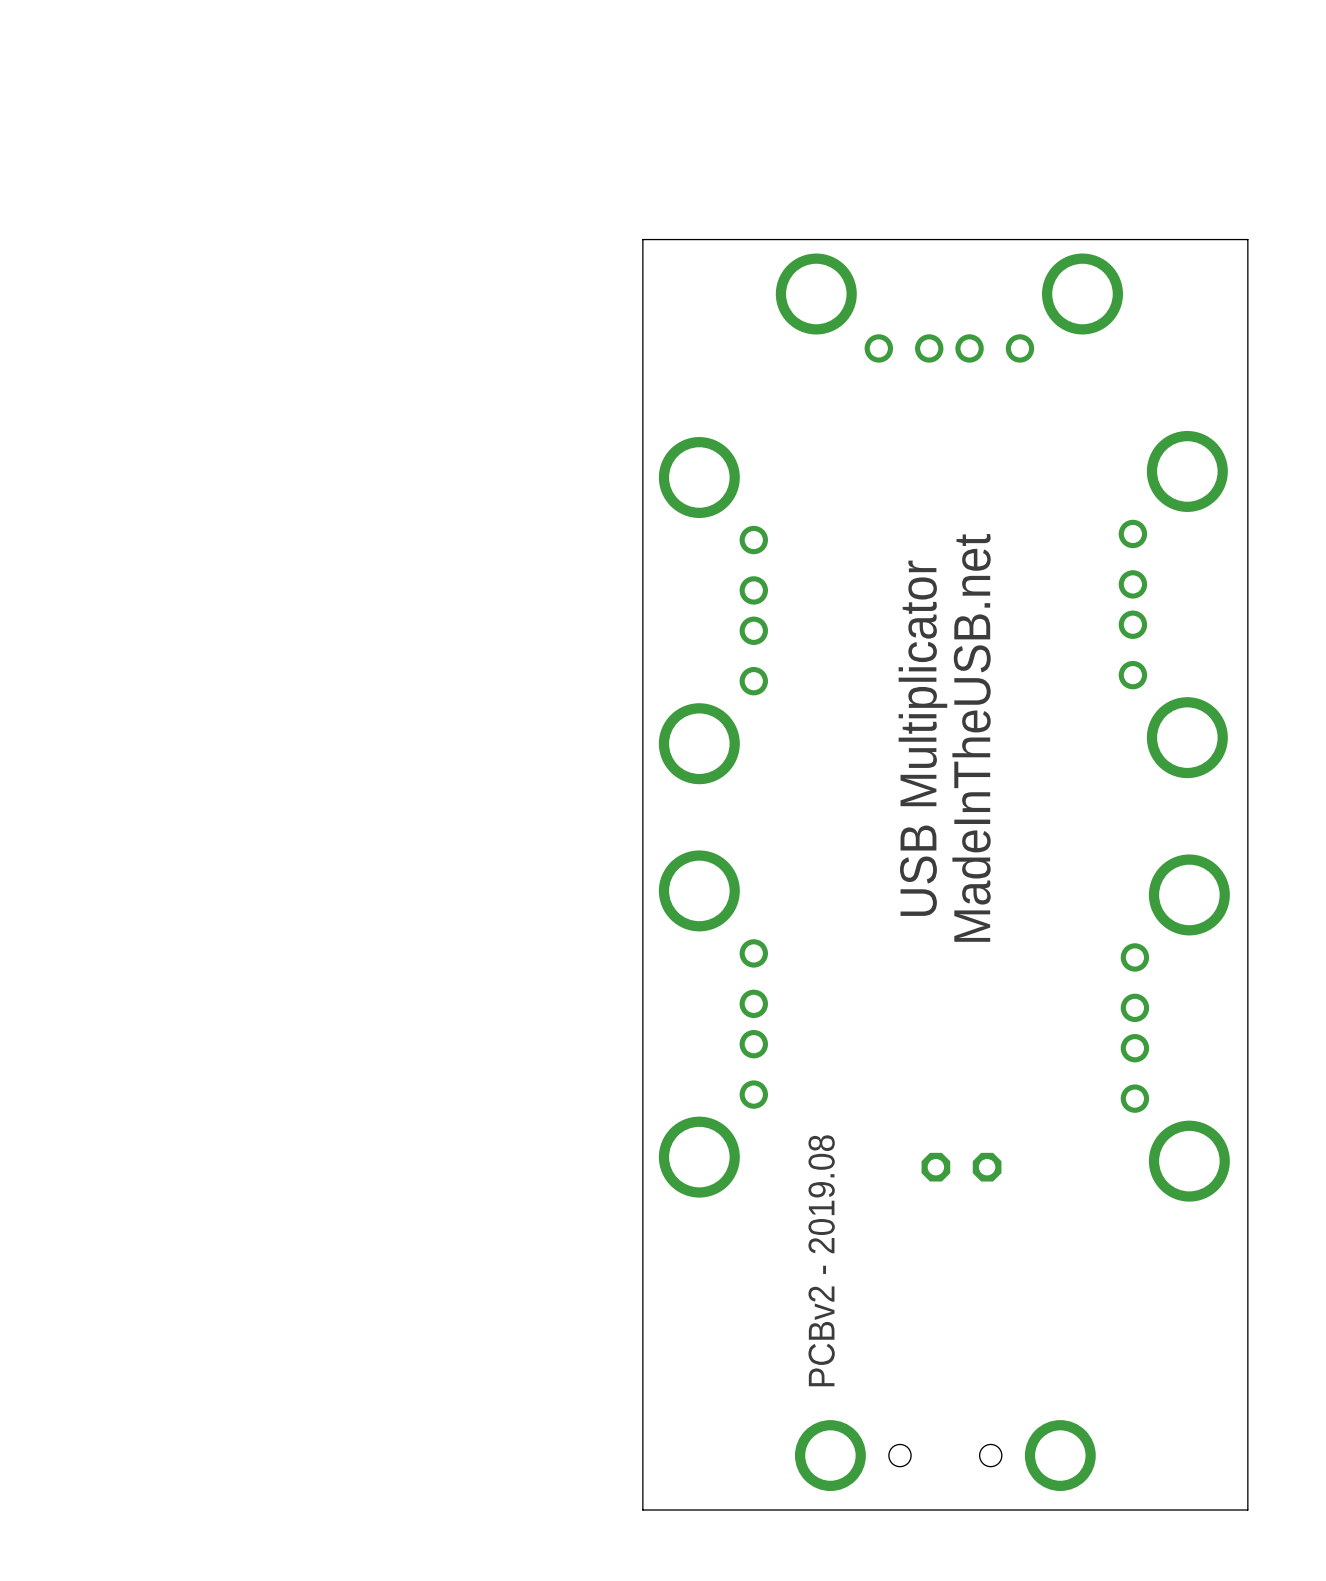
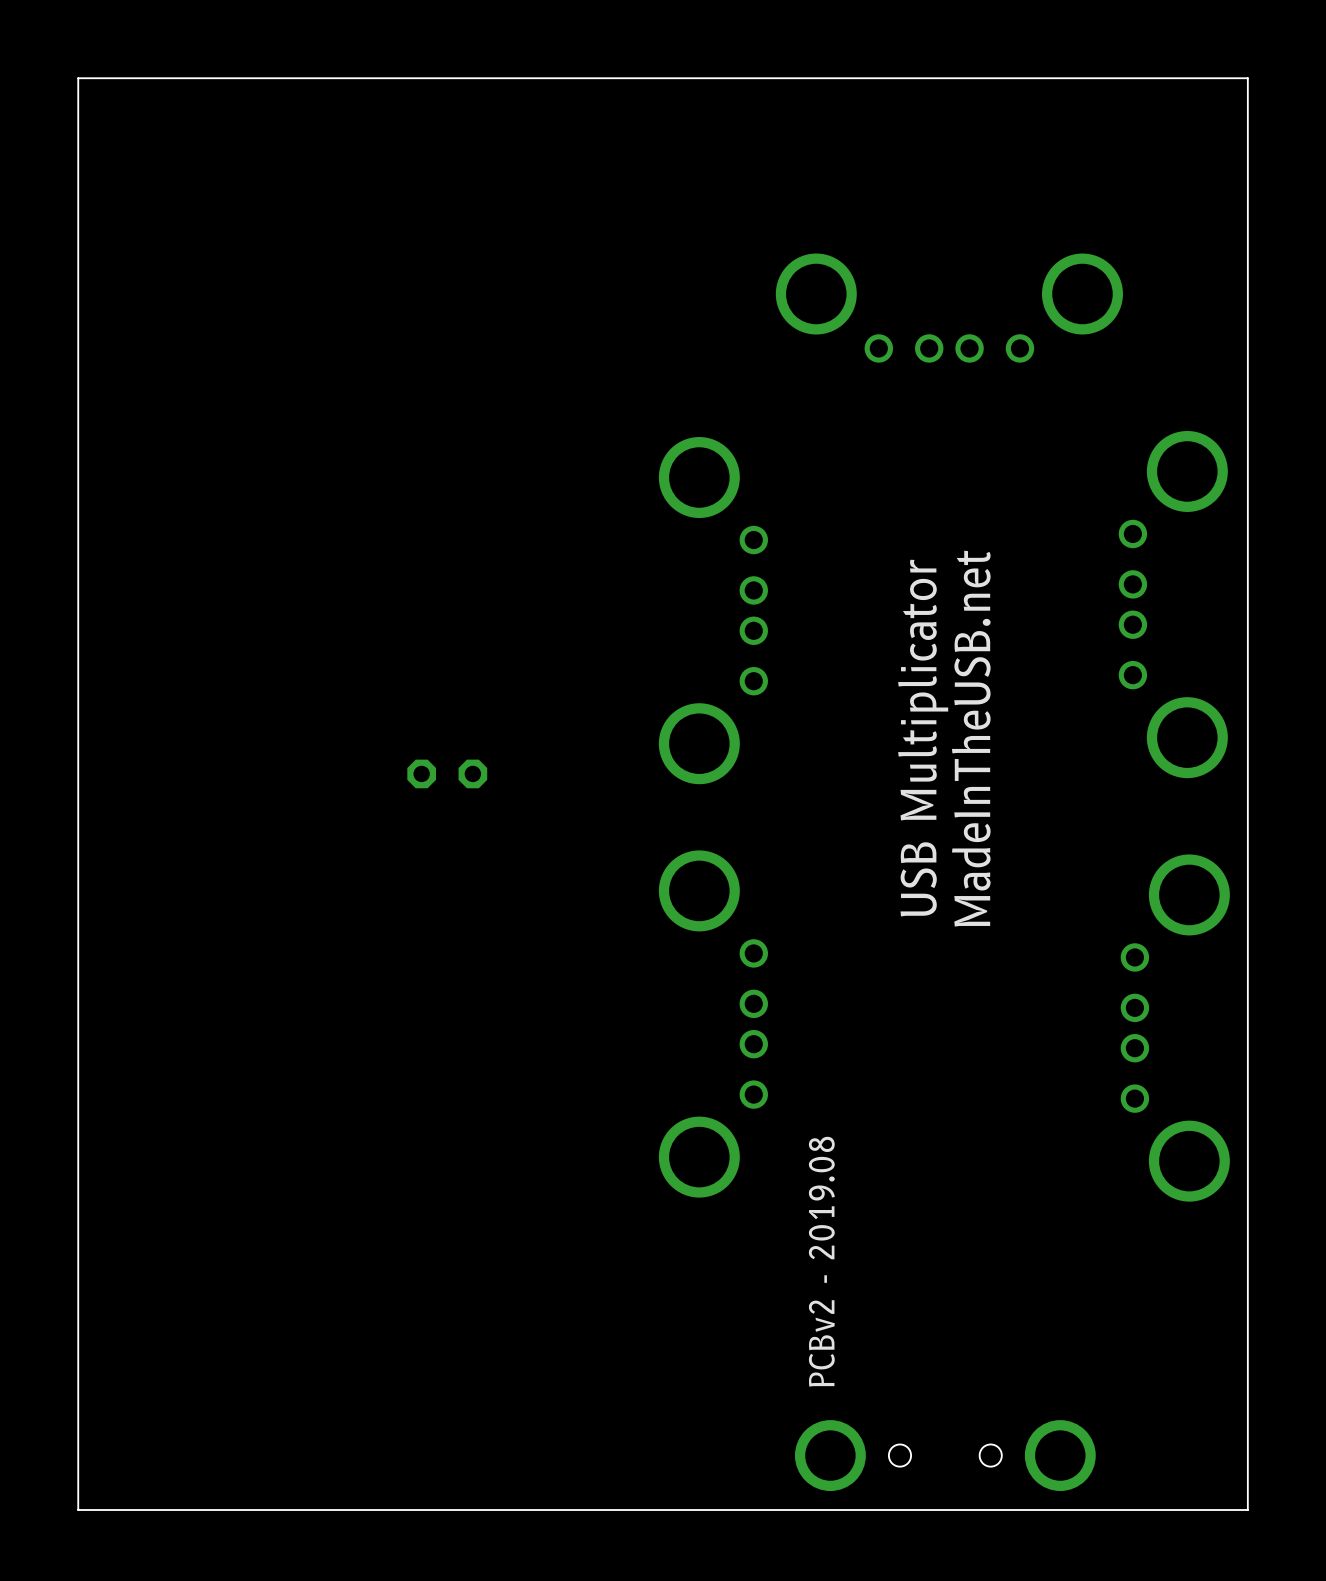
board edge: (1247, 239) (642, 239) (642, 1510) -> (1247, 239) (1247, 78) (78, 78) (78, 1510) (642, 1510)
part: none -> (447, 773)
part: (961, 1167) -> none

